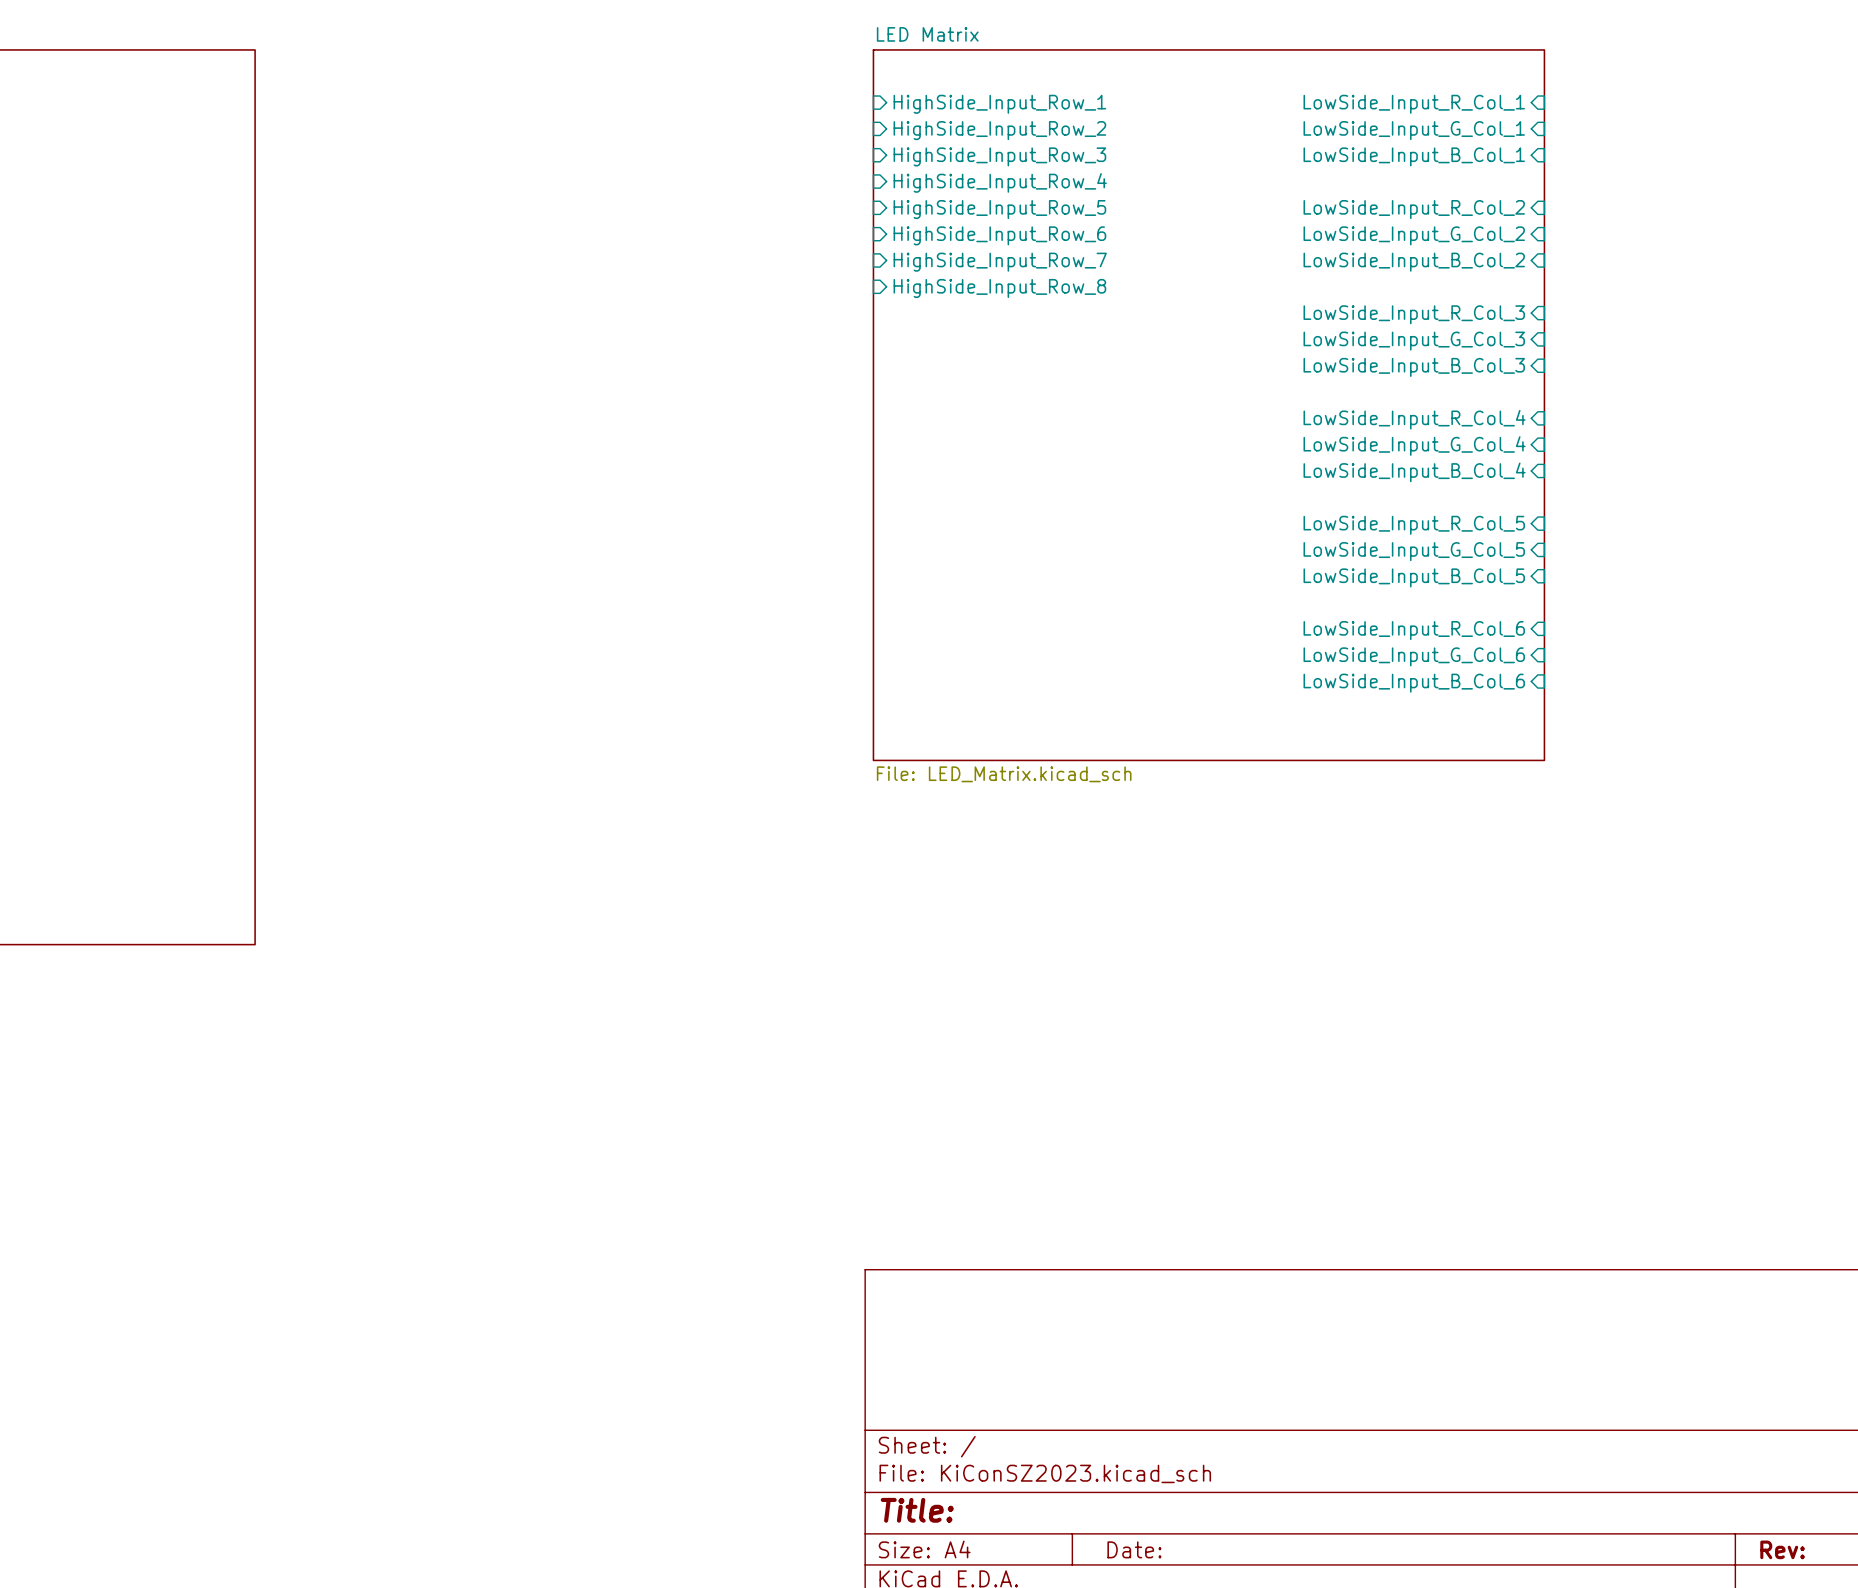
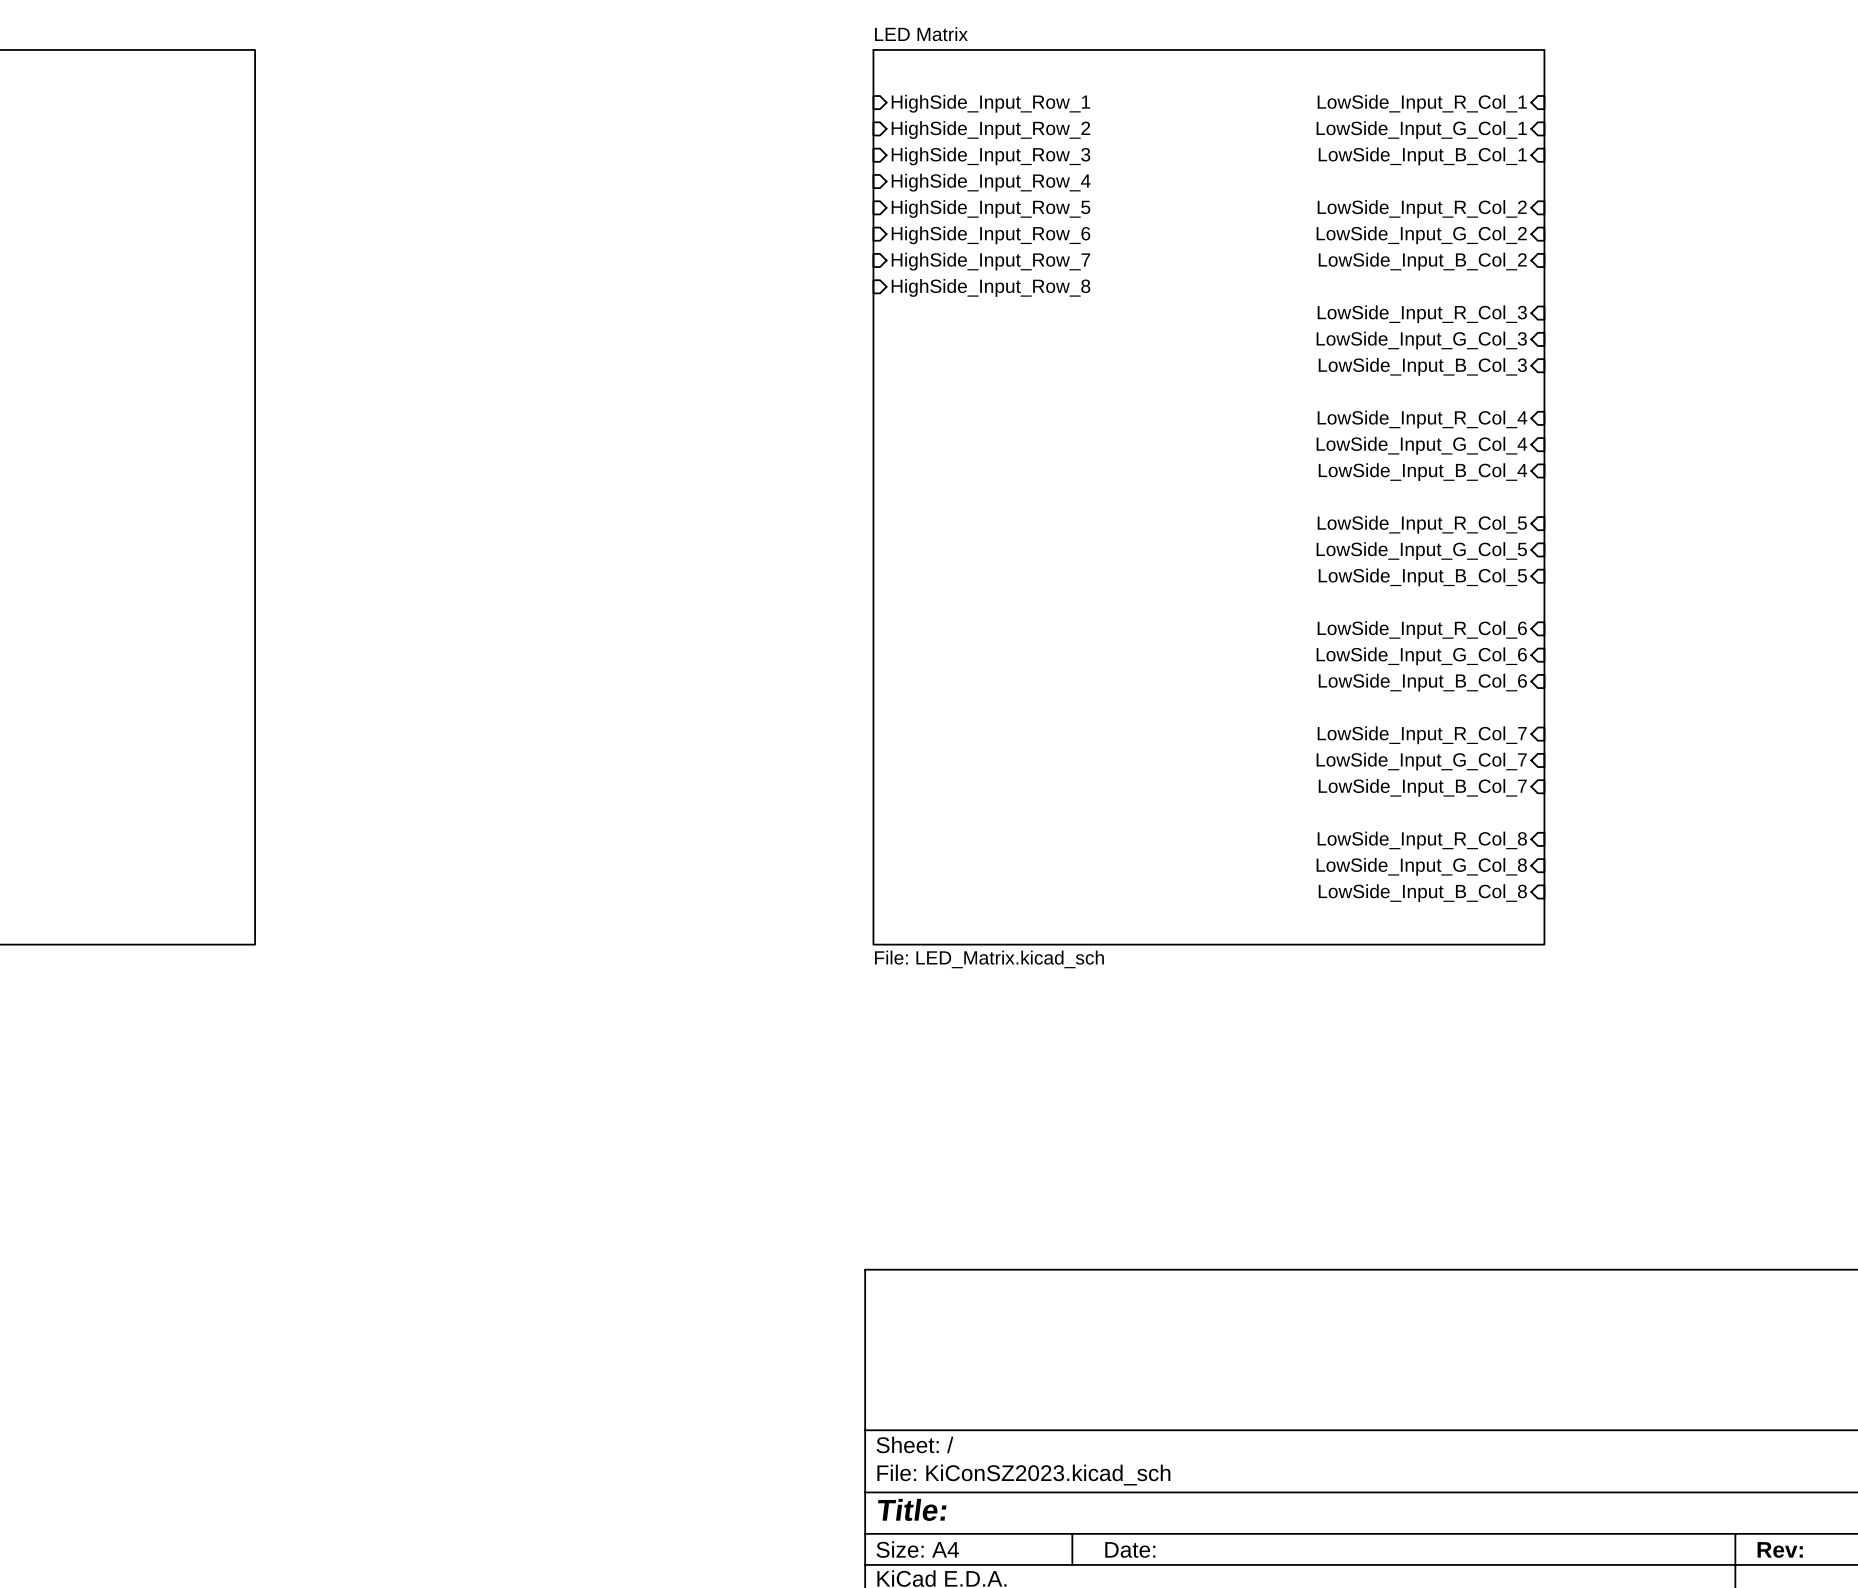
sheet LED Matrix: File: LED_Matrix.kicad_sch (1208, 405) -> none
sheet LED Matrix: none -> File: LED_Matrix.kicad_sch (1208, 497)
sheet pin: none -> LowSide_Input_R_Col_7 (1422, 735)
sheet pin: none -> LowSide_Input_G_Col_7 (1421, 761)
sheet pin: none -> LowSide_Input_B_Col_7 (1422, 787)
sheet pin: none -> LowSide_Input_R_Col_8 (1422, 840)
sheet pin: none -> LowSide_Input_G_Col_8 (1421, 866)
sheet pin: none -> LowSide_Input_B_Col_8 (1422, 893)

